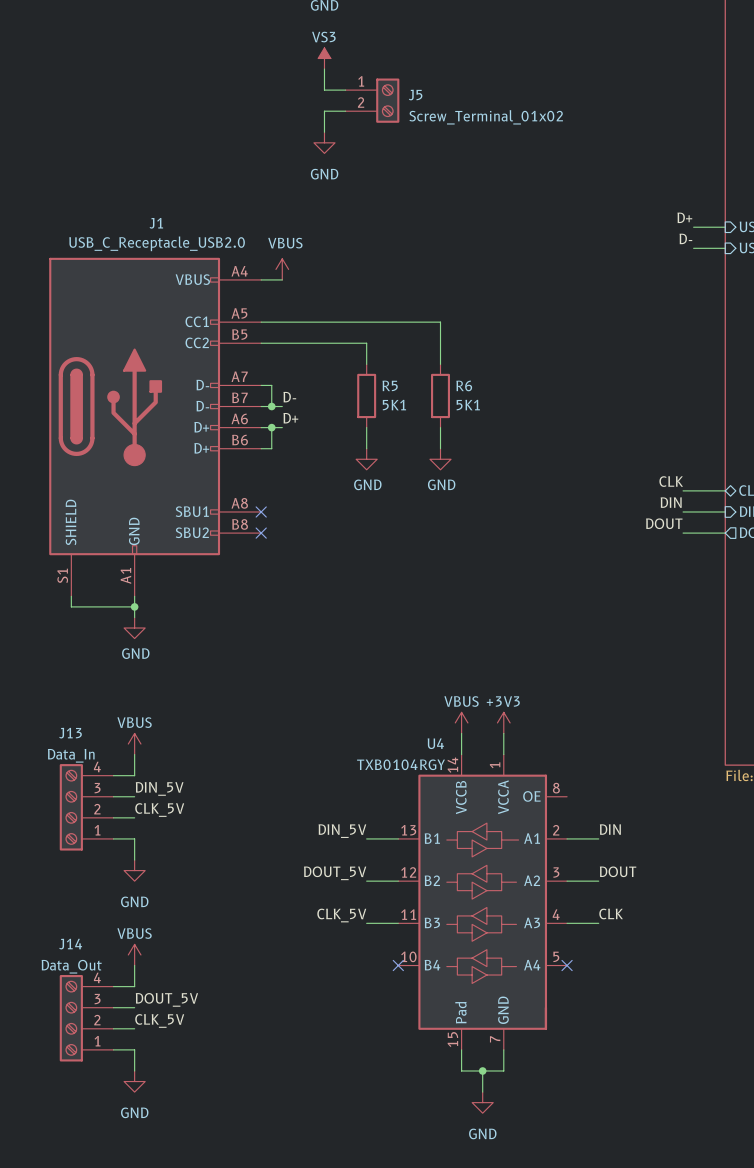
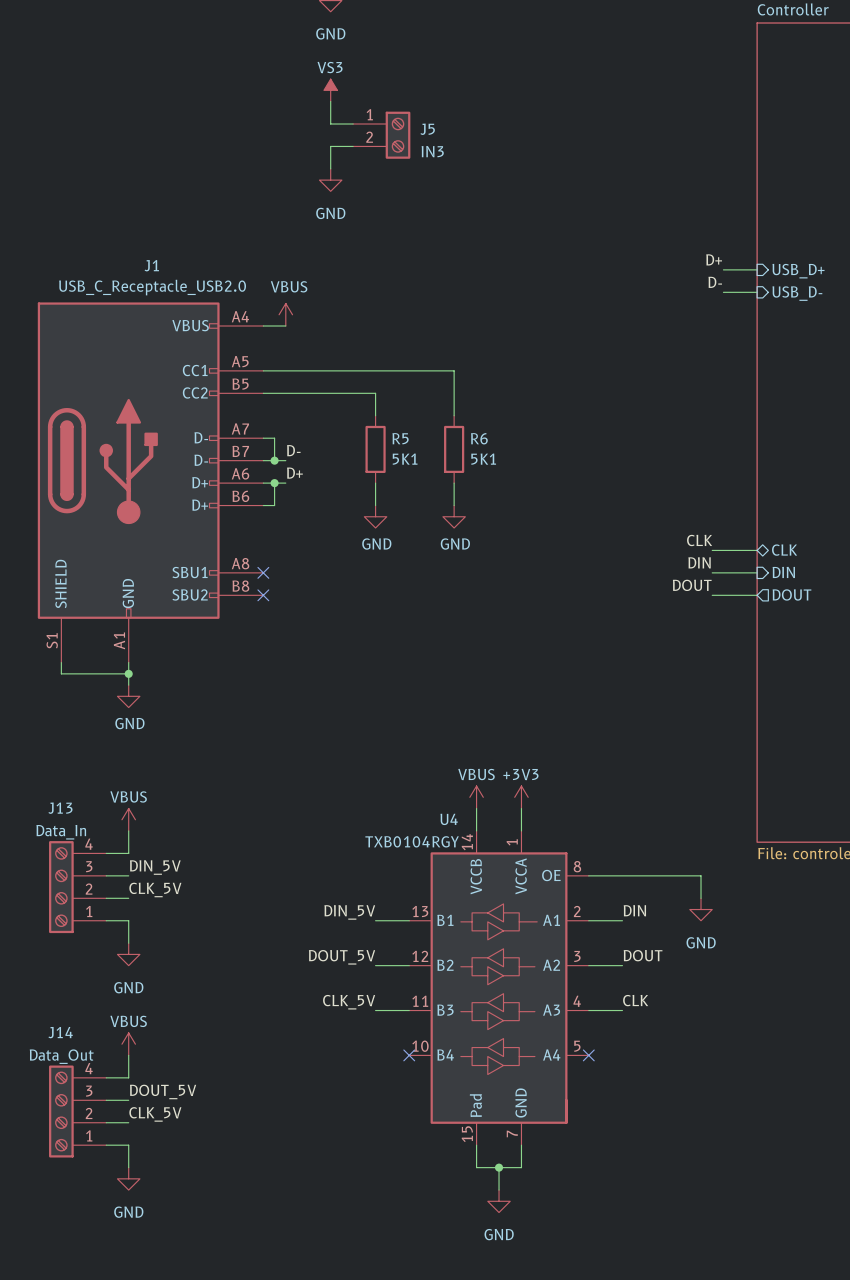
J5 value: Screw_Terminal_01x02 (486, 117) -> IN3 (432, 151)
wire: none -> (588, 875) (701, 875) (701, 898)
power symbol: none -> GND (701, 909)

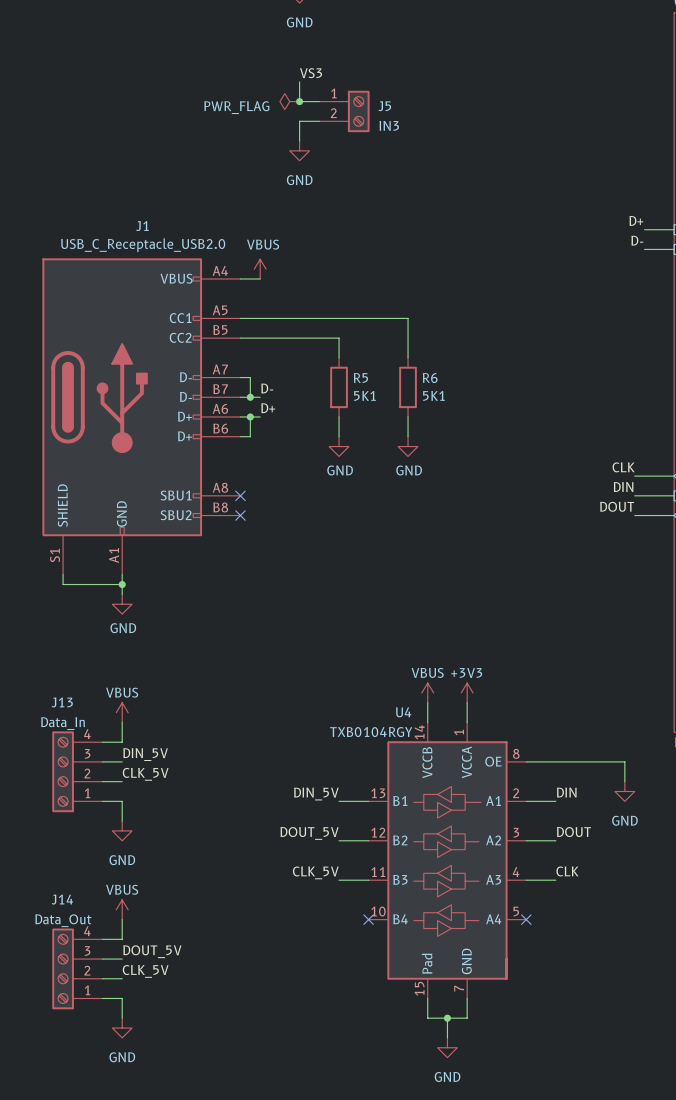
power symbol: VS3 (330, 90) -> none
label: none -> VS3 (311, 73)
power symbol: none -> PWR_FLAG (289, 101)
junction: none -> (299, 101)

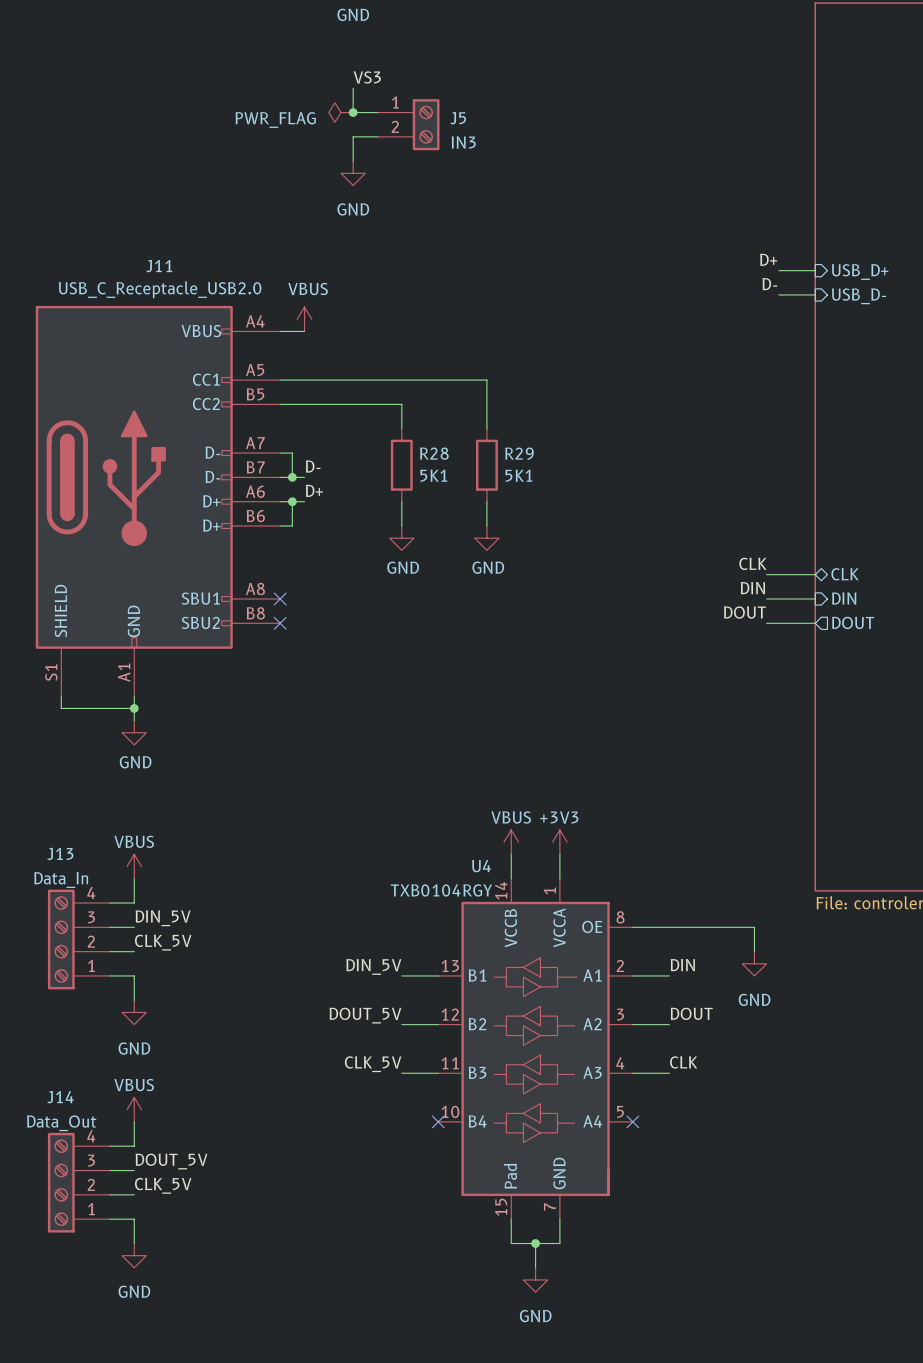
J1 name: J1 (142, 226) -> J11 (159, 266)
R5 name: R5 (360, 378) -> R28 (434, 453)
R6 name: R6 (430, 378) -> R29 (519, 453)

